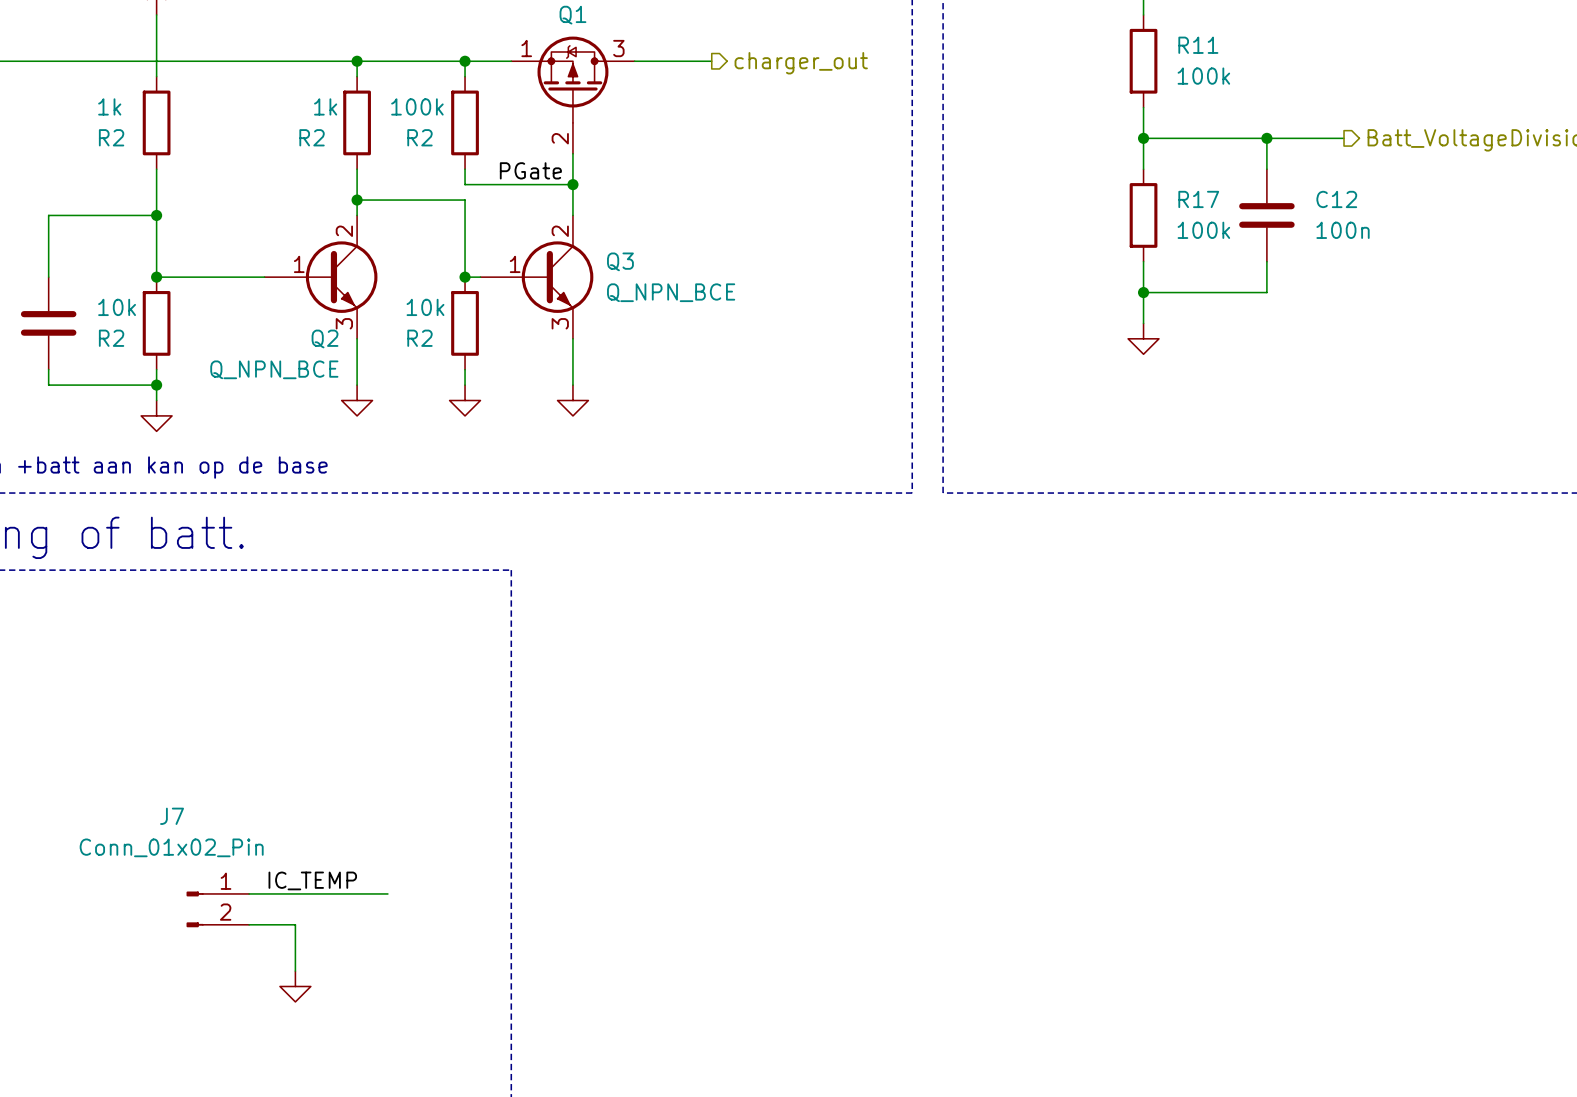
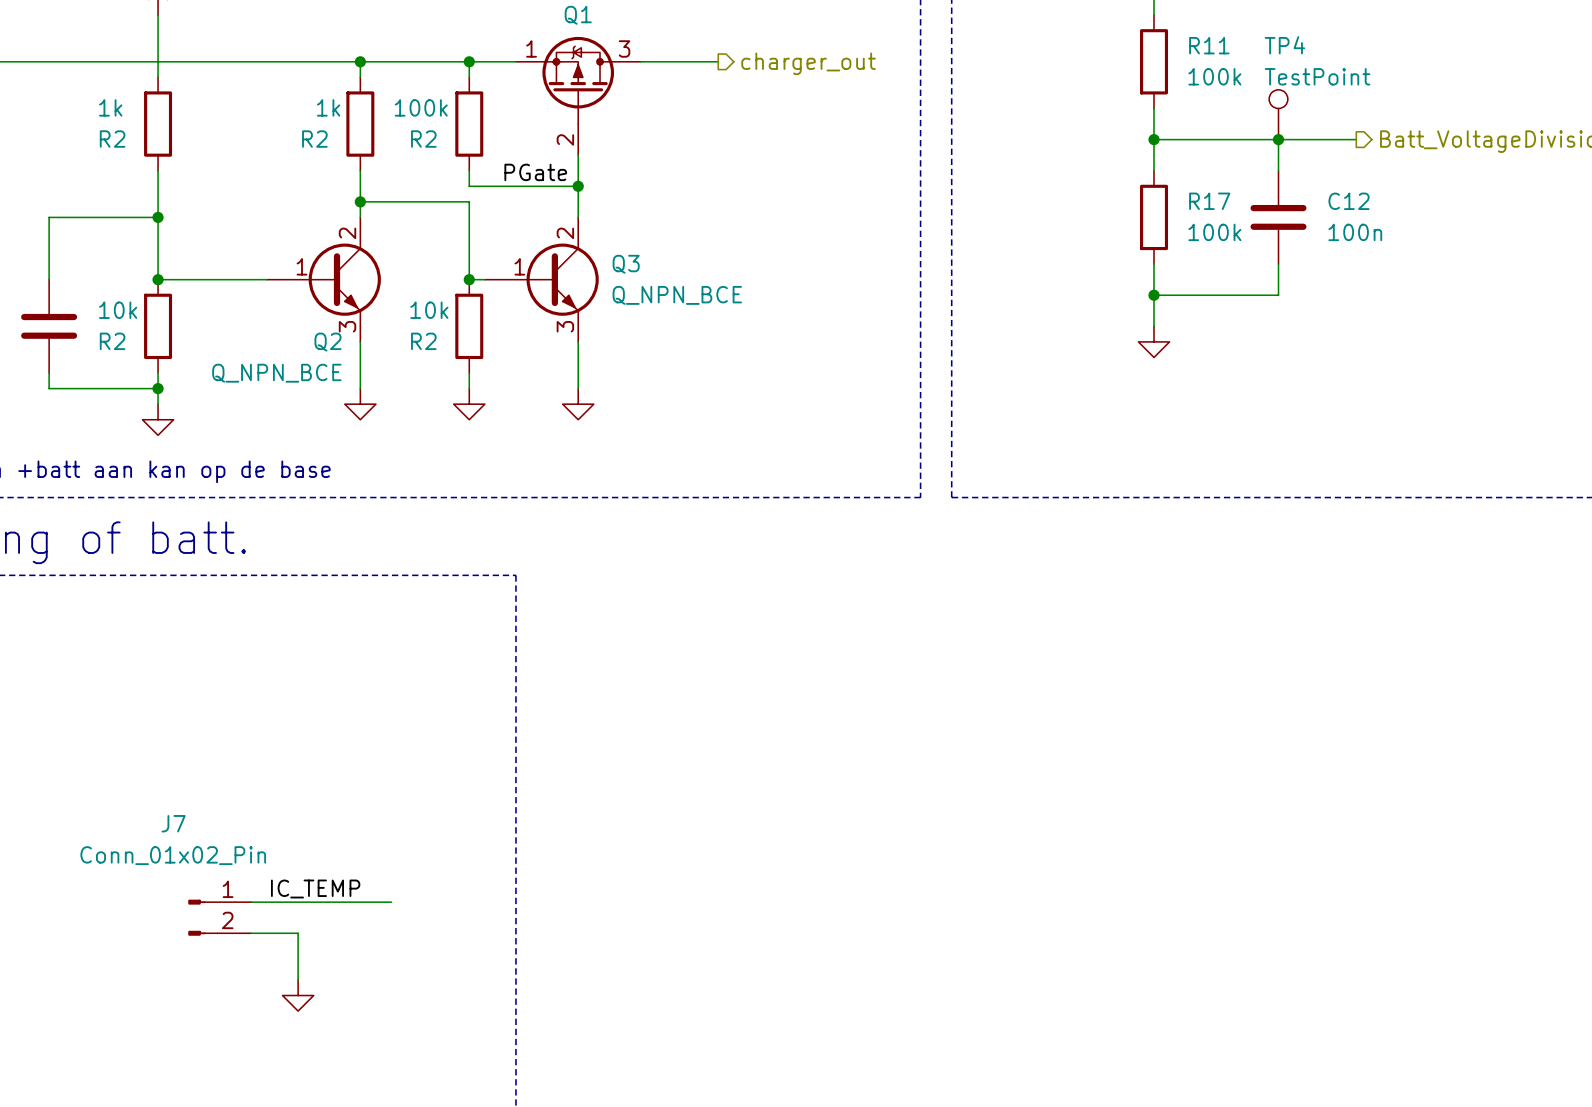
TP4: none -> TestPoint (1278, 114)

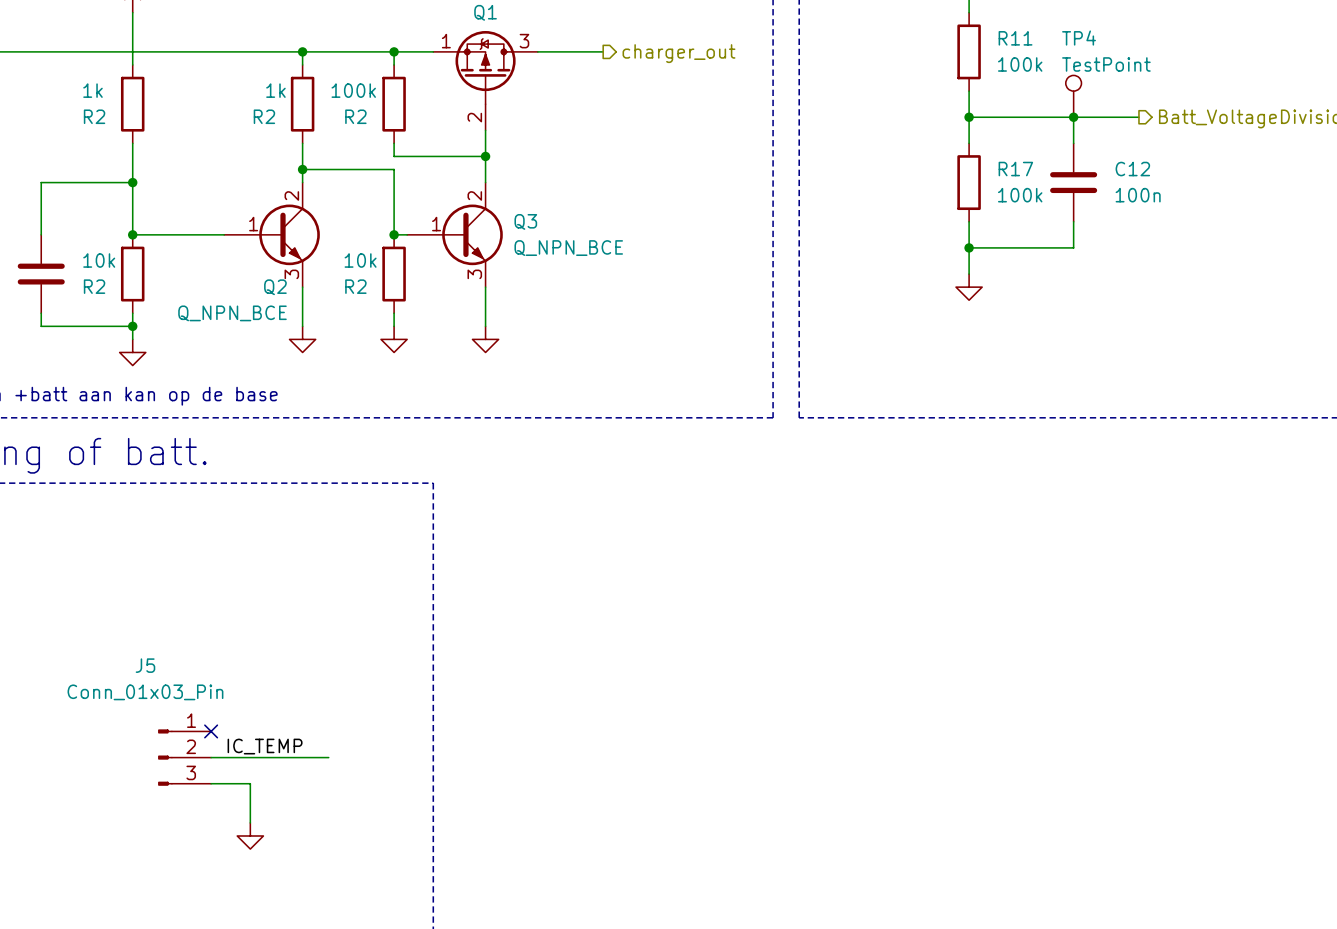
label: PGate (535, 172) -> none
no-connect mark: none -> (211, 731)
J5: none -> Conn_01x03_Pin (184, 757)
J7: Conn_01x02_Pin (219, 917) -> none

